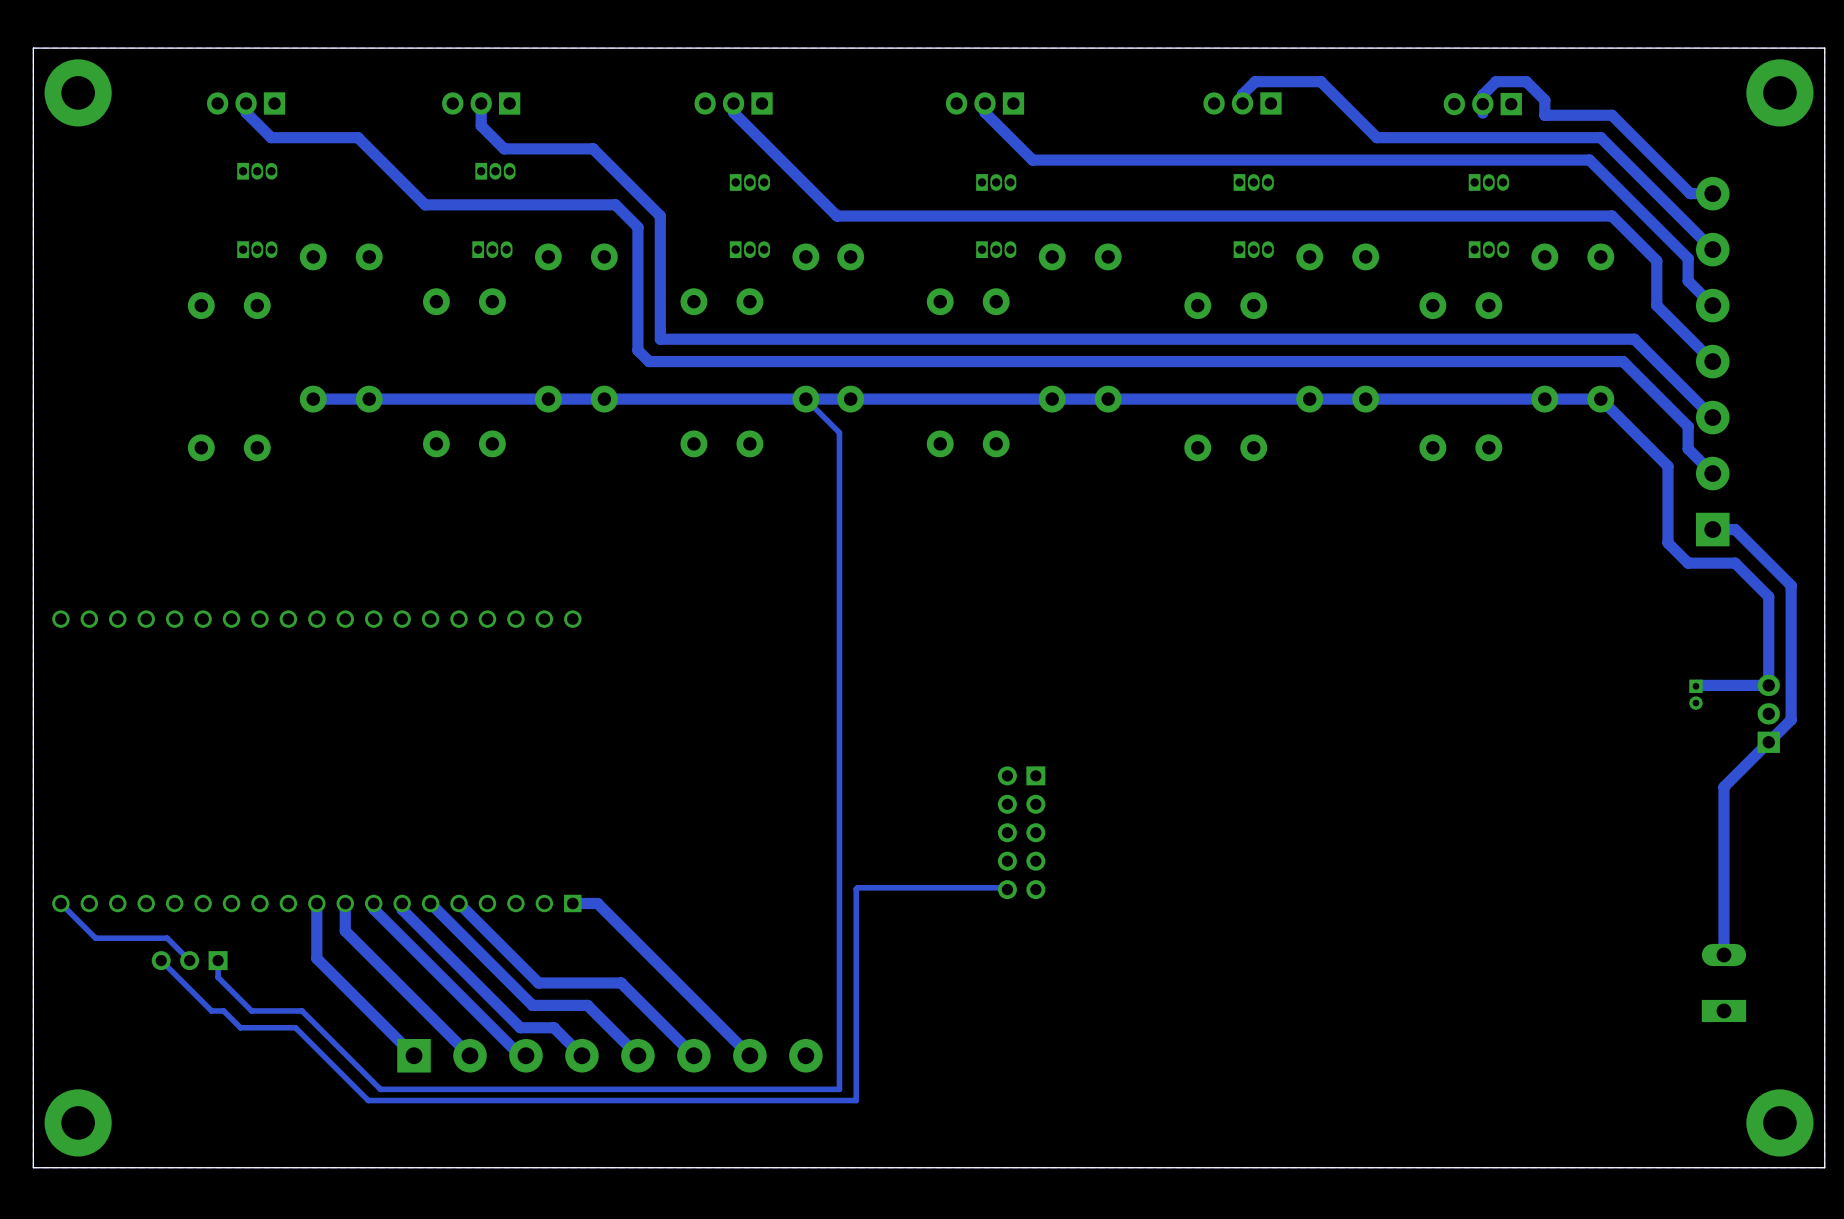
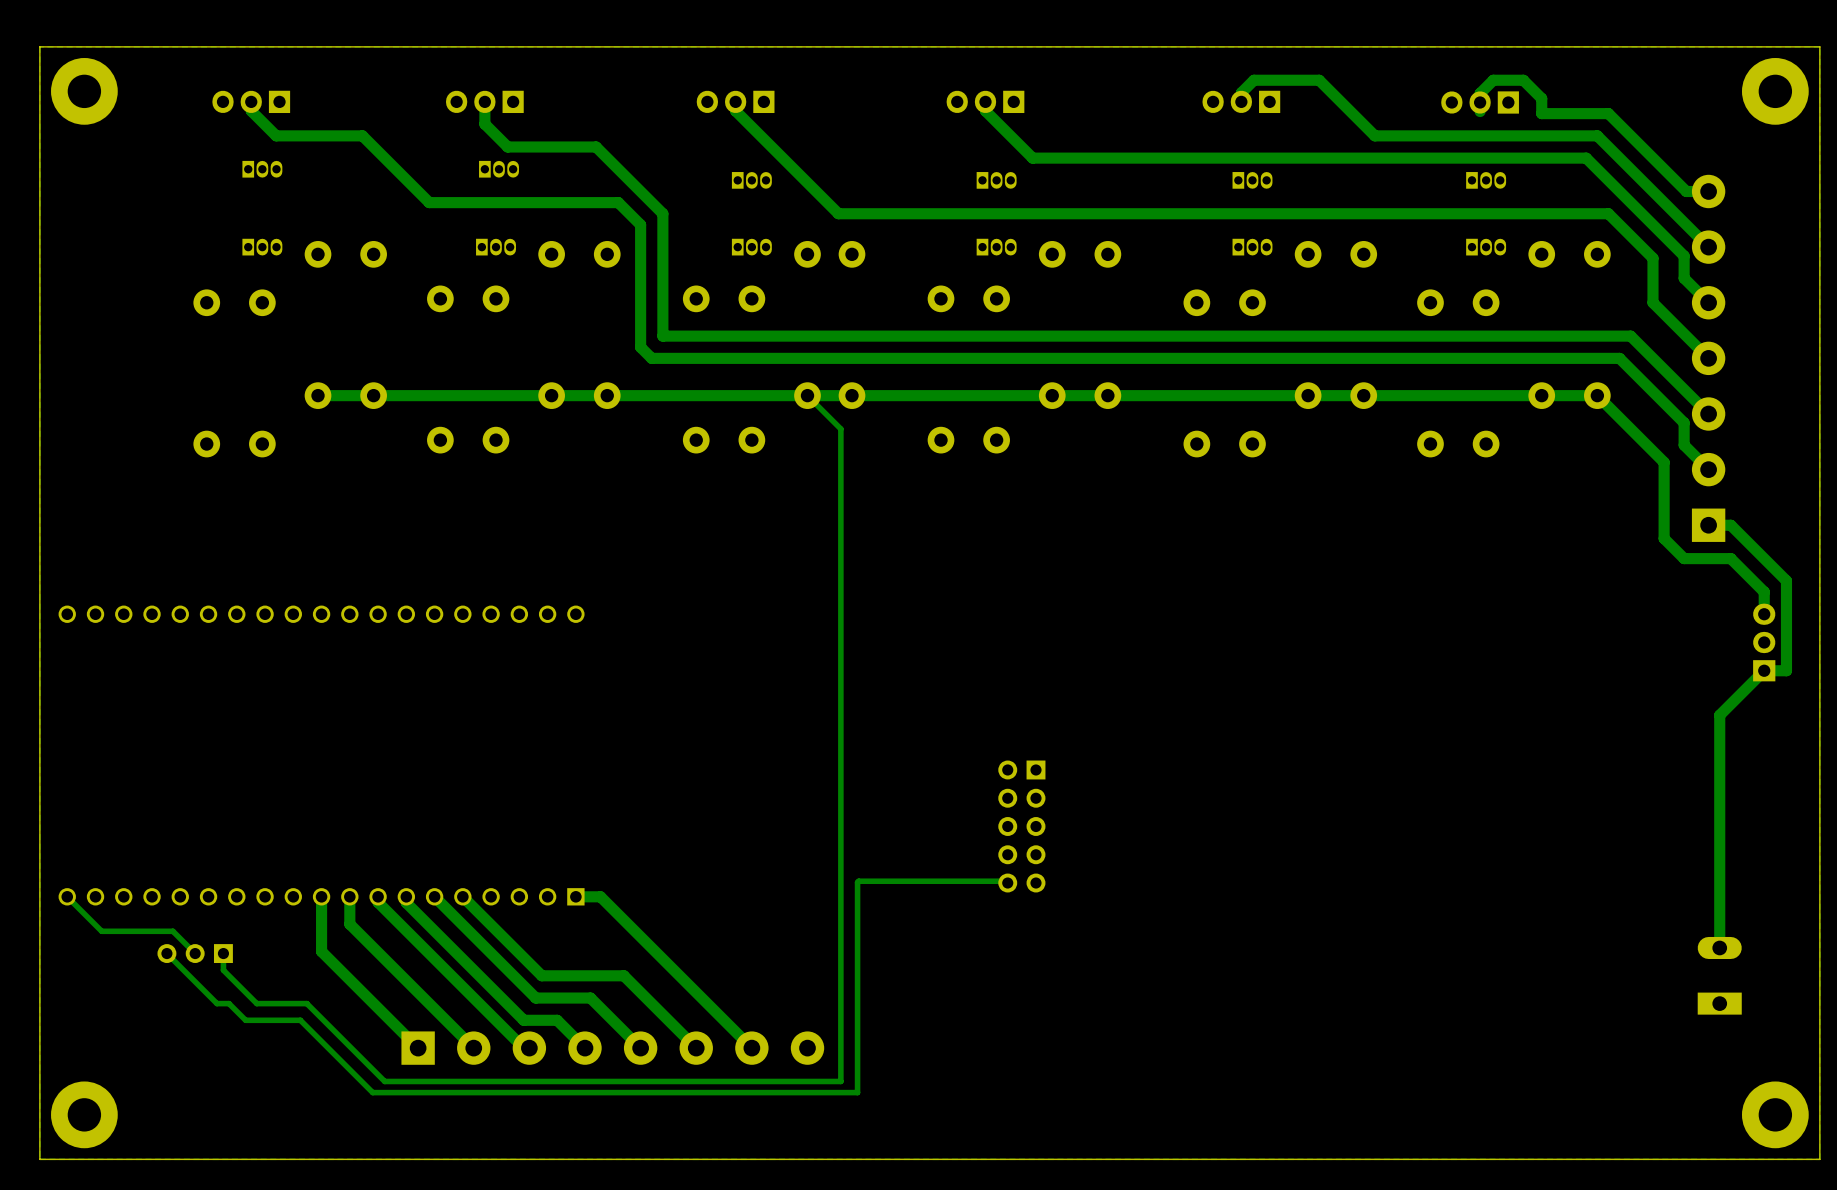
track: (1768, 619) (1768, 685) (1695, 686) -> none
track: (1791, 675) (1791, 719) (1723, 787) -> (1786, 670) (1764, 670) (1719, 715) (1719, 781)
part: (1695, 694) -> none
part position: (1768, 713) -> (1764, 642)

